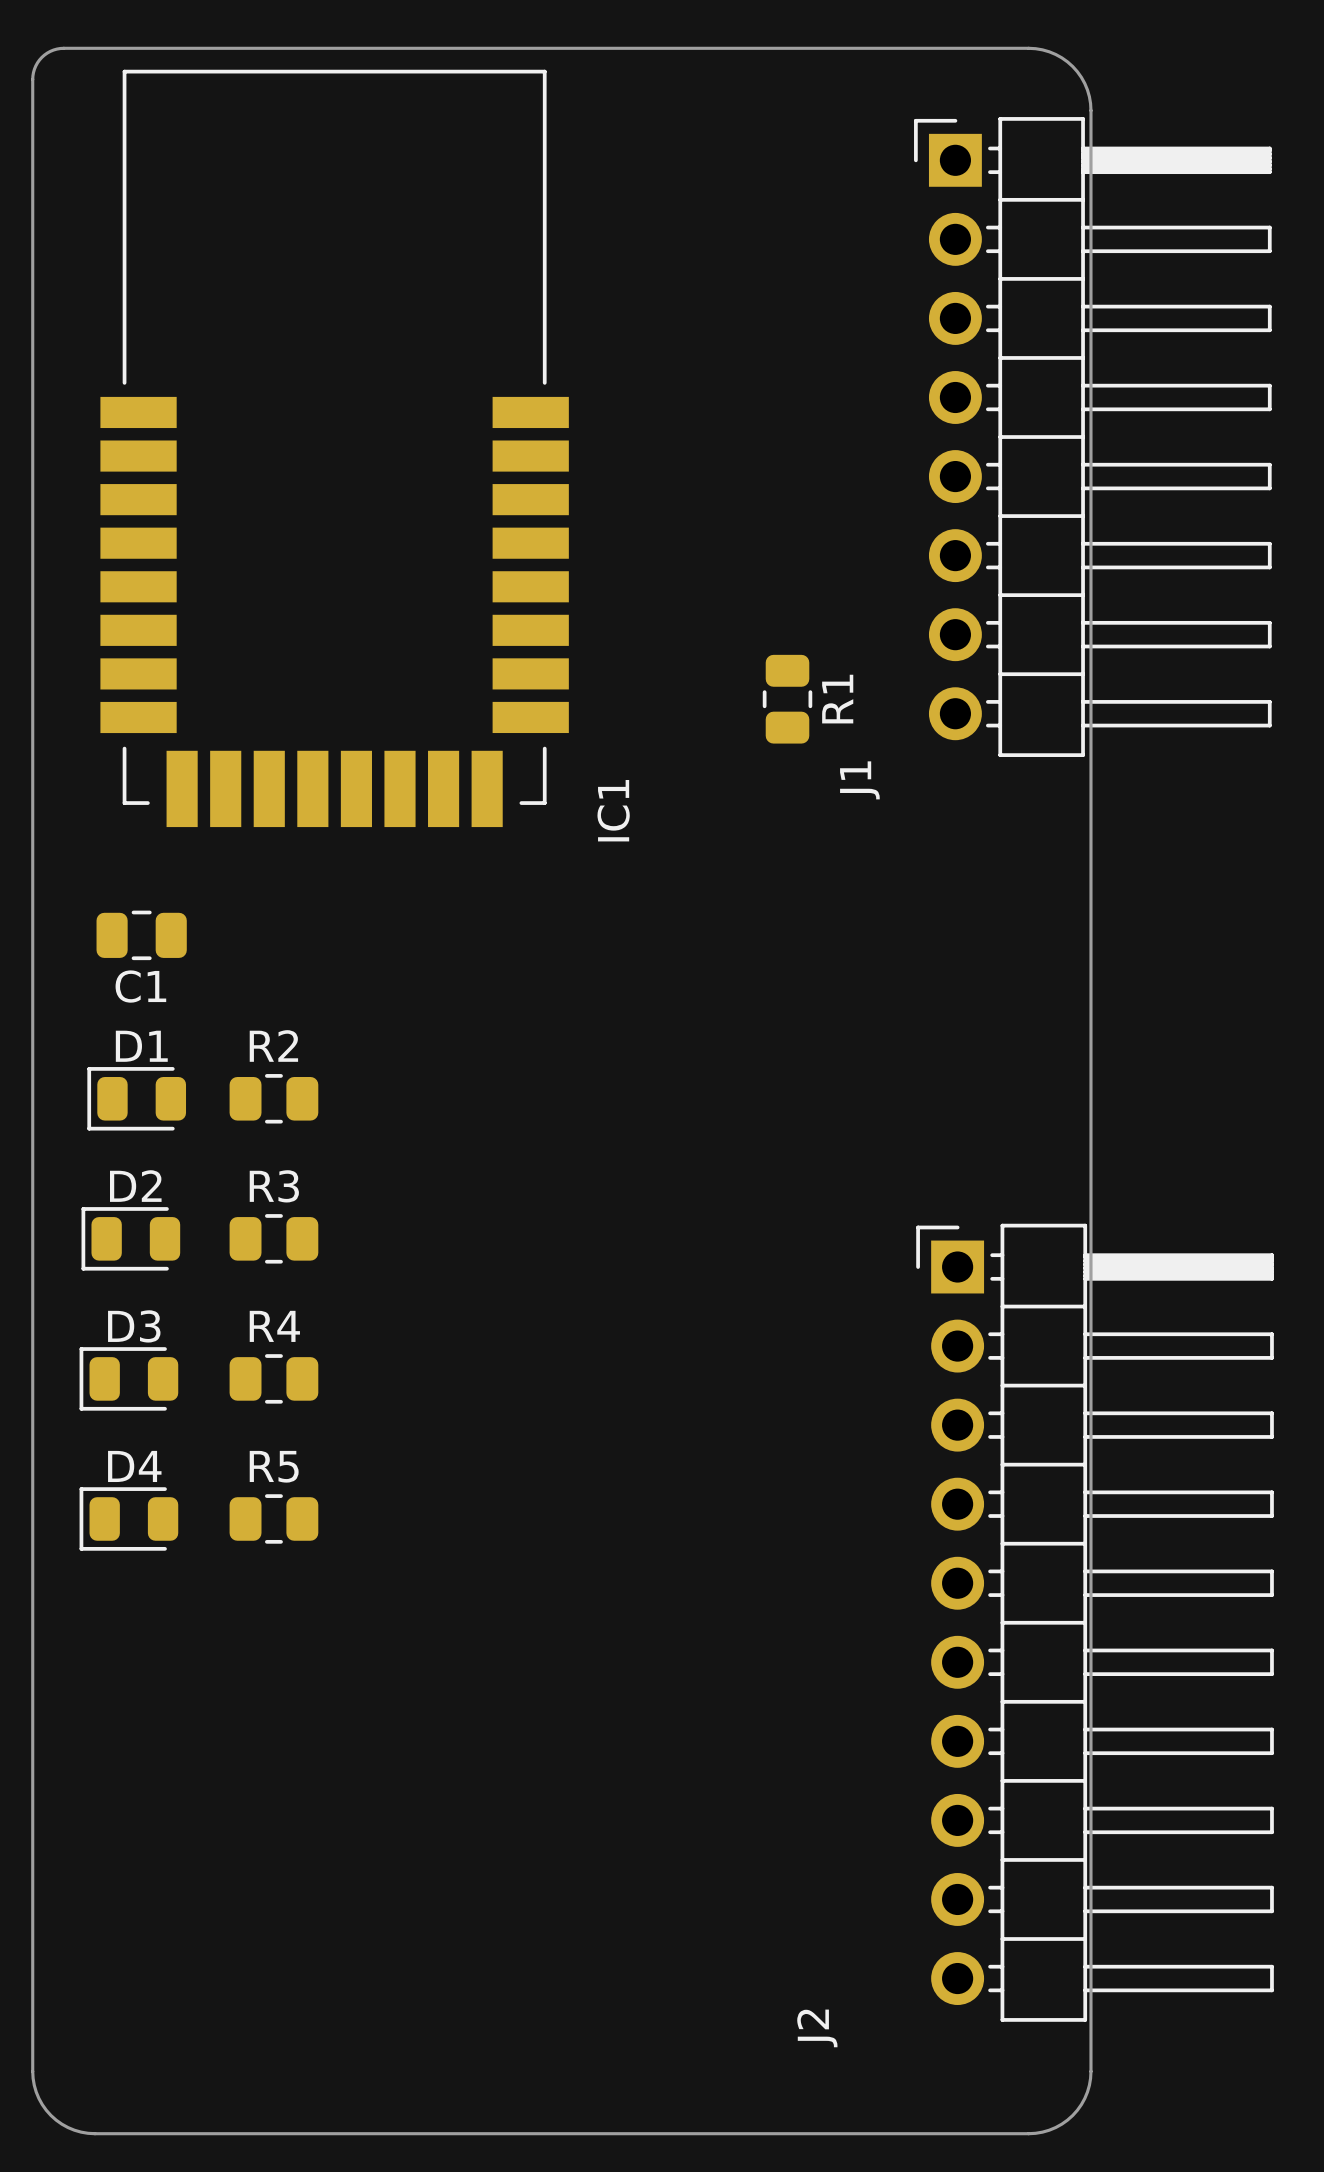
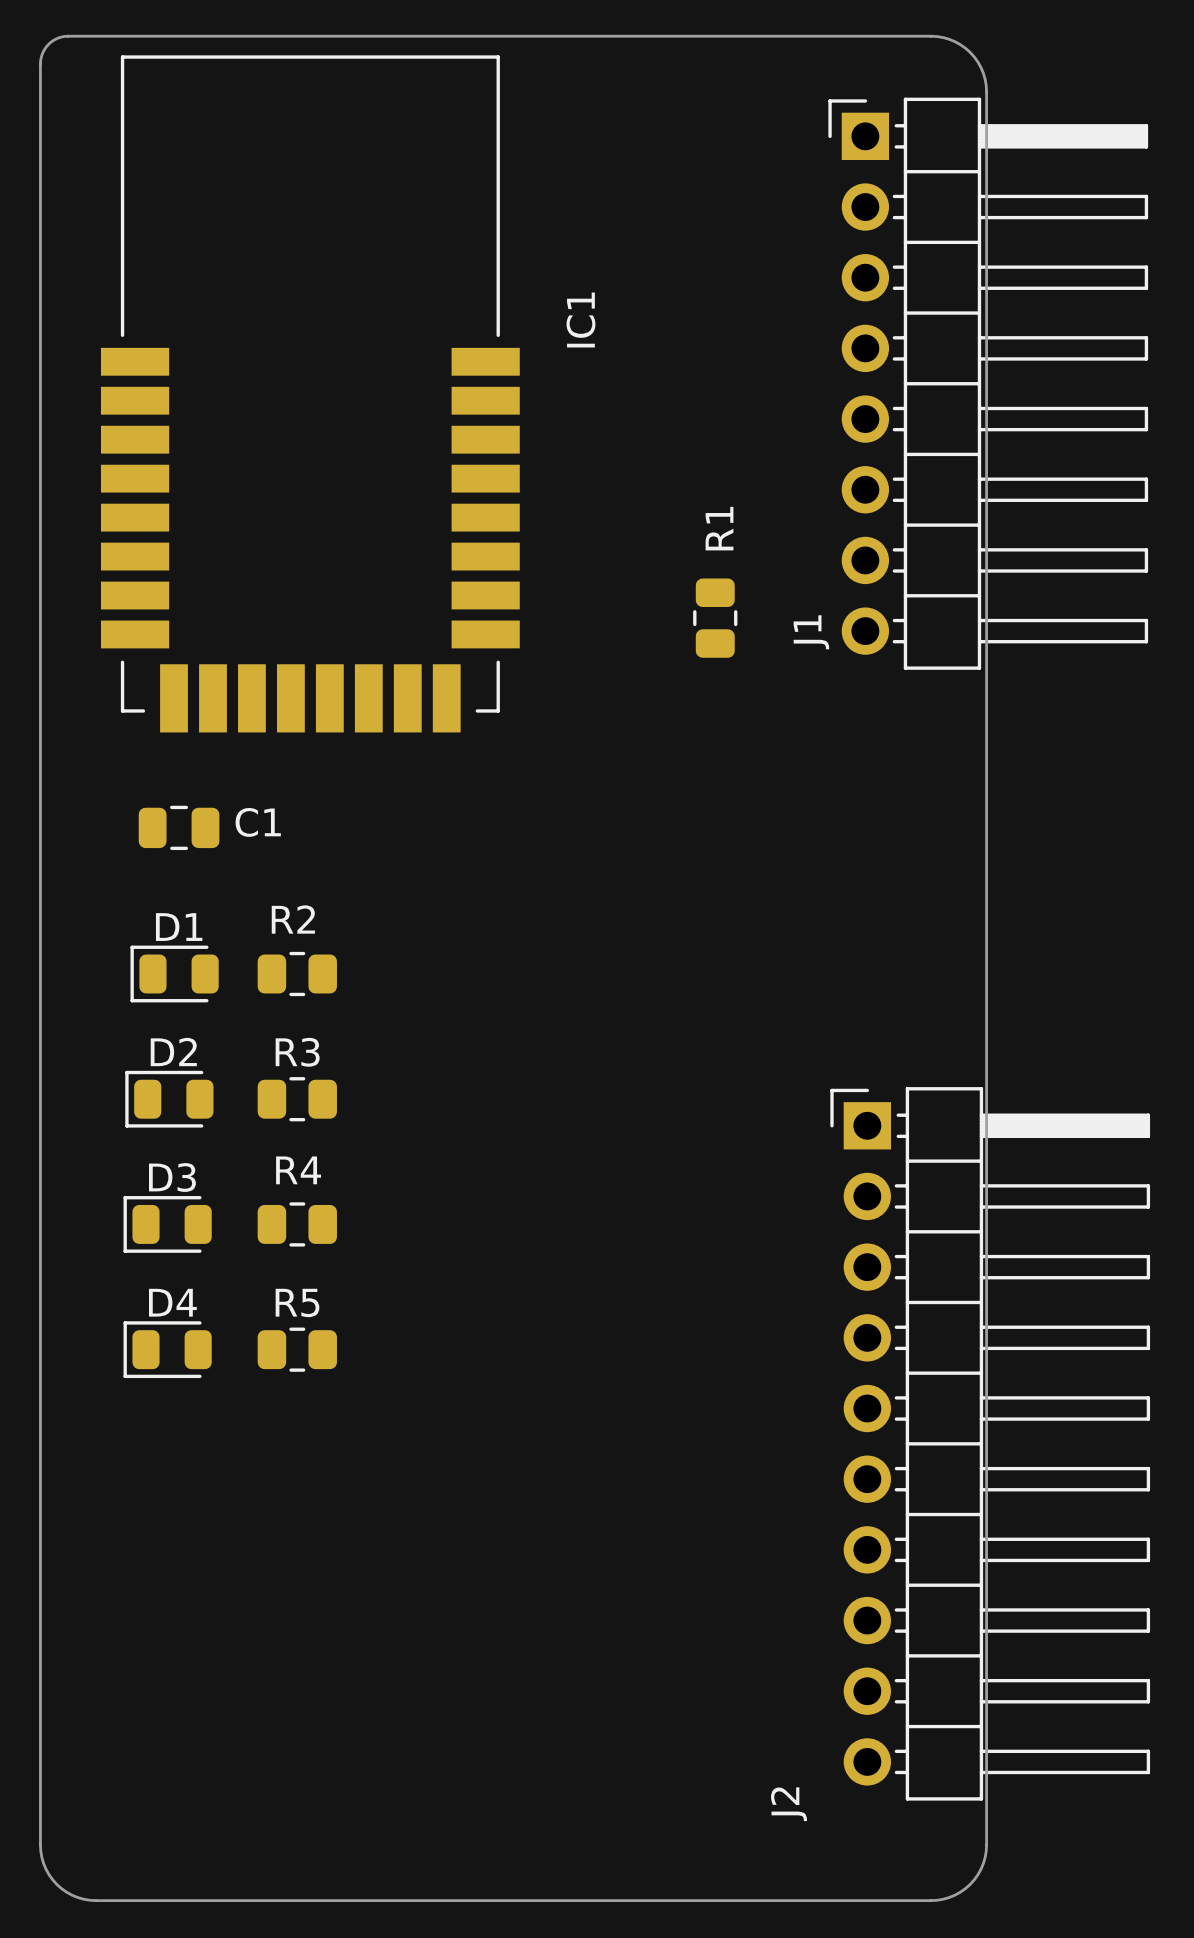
R1 name position: R1 (837, 699) -> R1 (719, 528)
J1 name position: J1 (859, 780) -> J1 (811, 632)
IC1 name position: IC1 (613, 810) -> IC1 (580, 320)
C1 position: (141, 935) -> (179, 827)
C1 name position: C1 (140, 986) -> C1 (258, 822)
R2 name position: R2 (273, 1045) -> R2 (293, 919)
D1 position: (136, 1098) -> (174, 973)
R2 position: (273, 1098) -> (297, 973)
D2 position: (130, 1238) -> (169, 1099)
R3 position: (273, 1238) -> (297, 1099)
R4 name position: R4 (274, 1326) -> R4 (298, 1170)
D3 position: (128, 1378) -> (167, 1224)
R4 position: (273, 1378) -> (297, 1224)
D4 position: (128, 1518) -> (167, 1349)
R5 position: (273, 1518) -> (297, 1349)
J2 name position: J2 (817, 2028) -> J2 (789, 1804)

